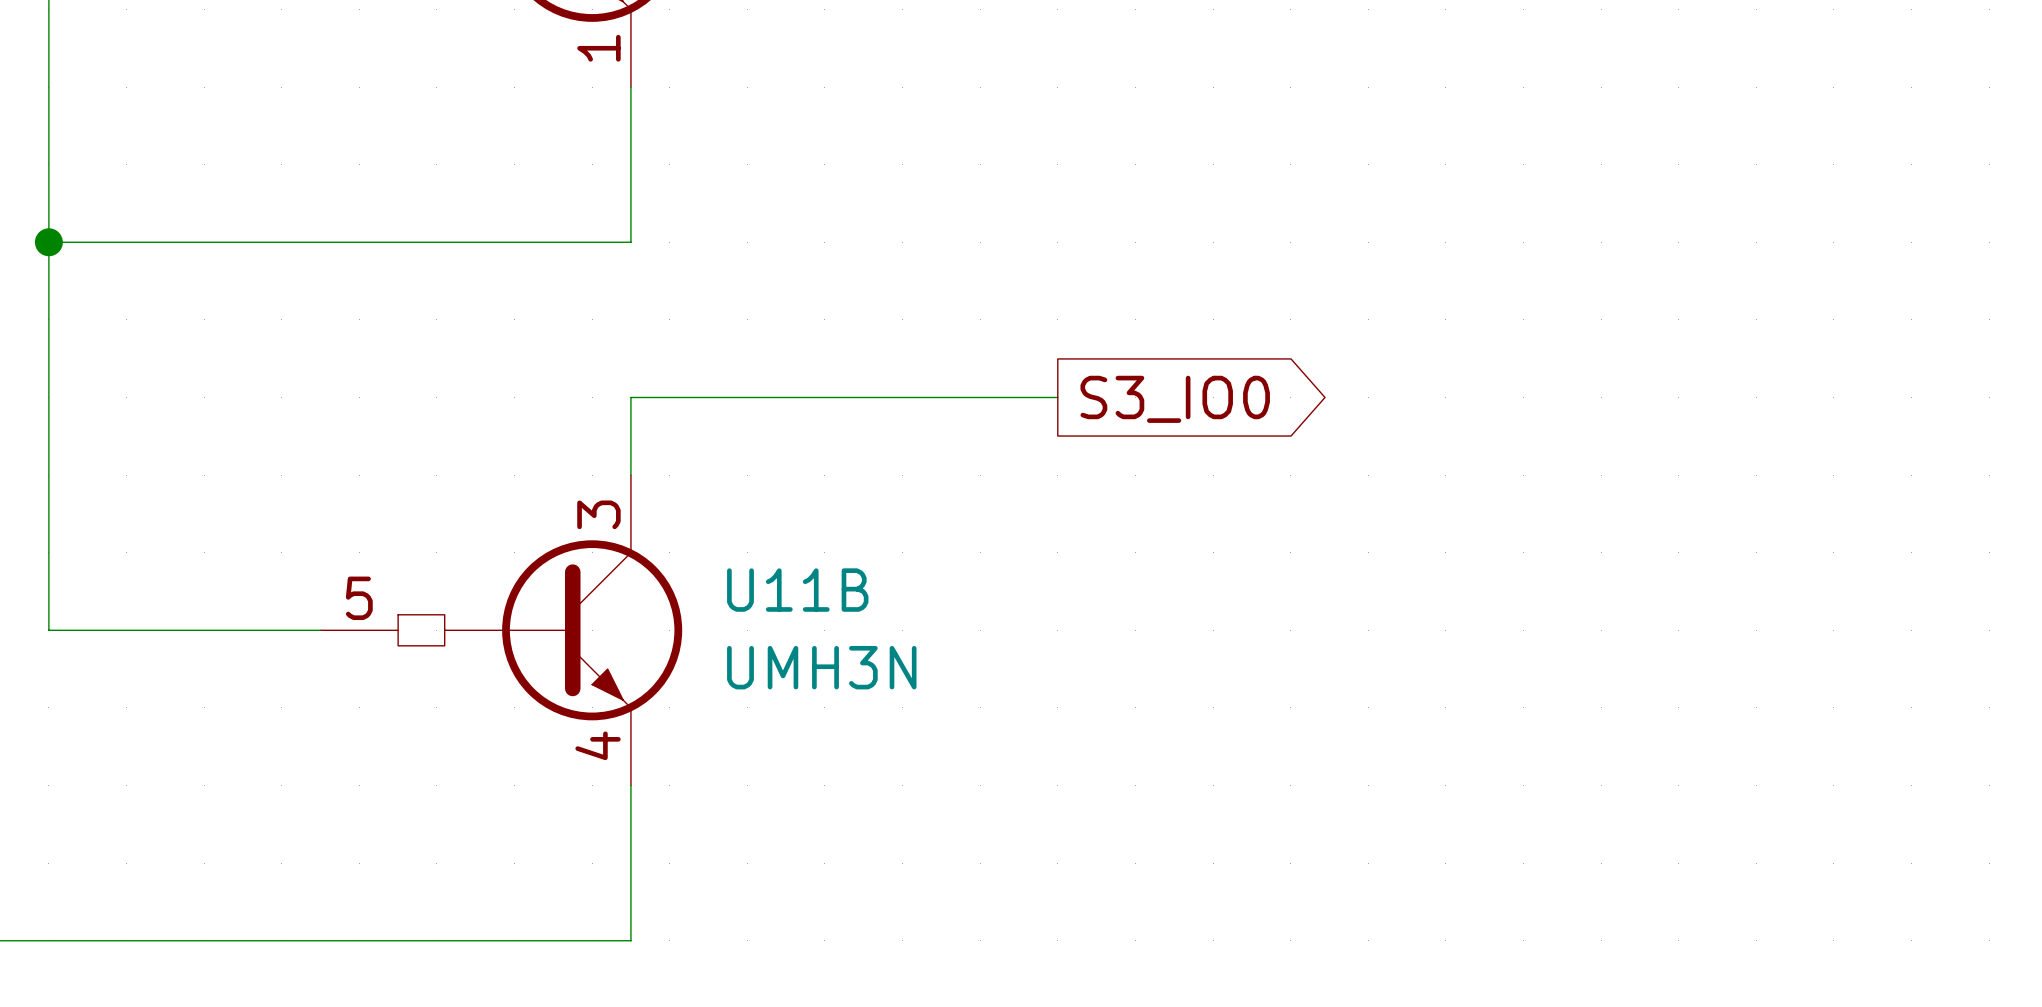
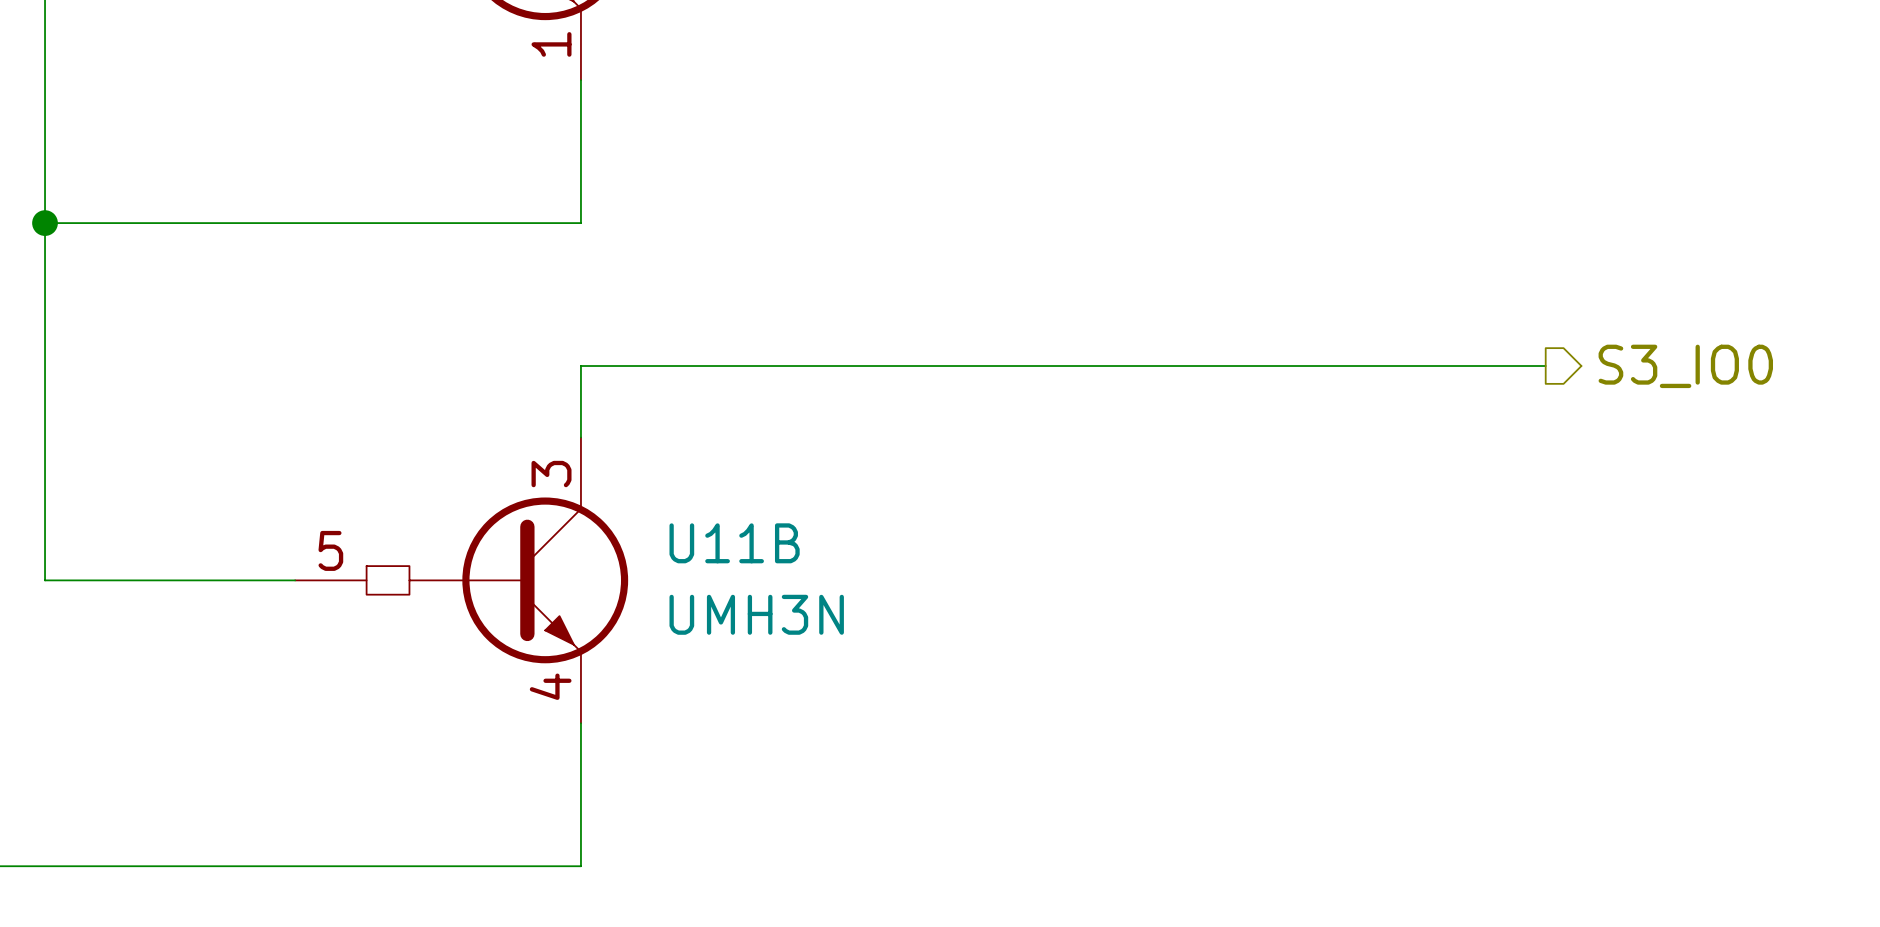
wire: none -> (974, 366) (1545, 366)
hierarchical label: none -> S3_IO0 (1685, 366)
global label: S3_IO0 (1175, 399) -> none

